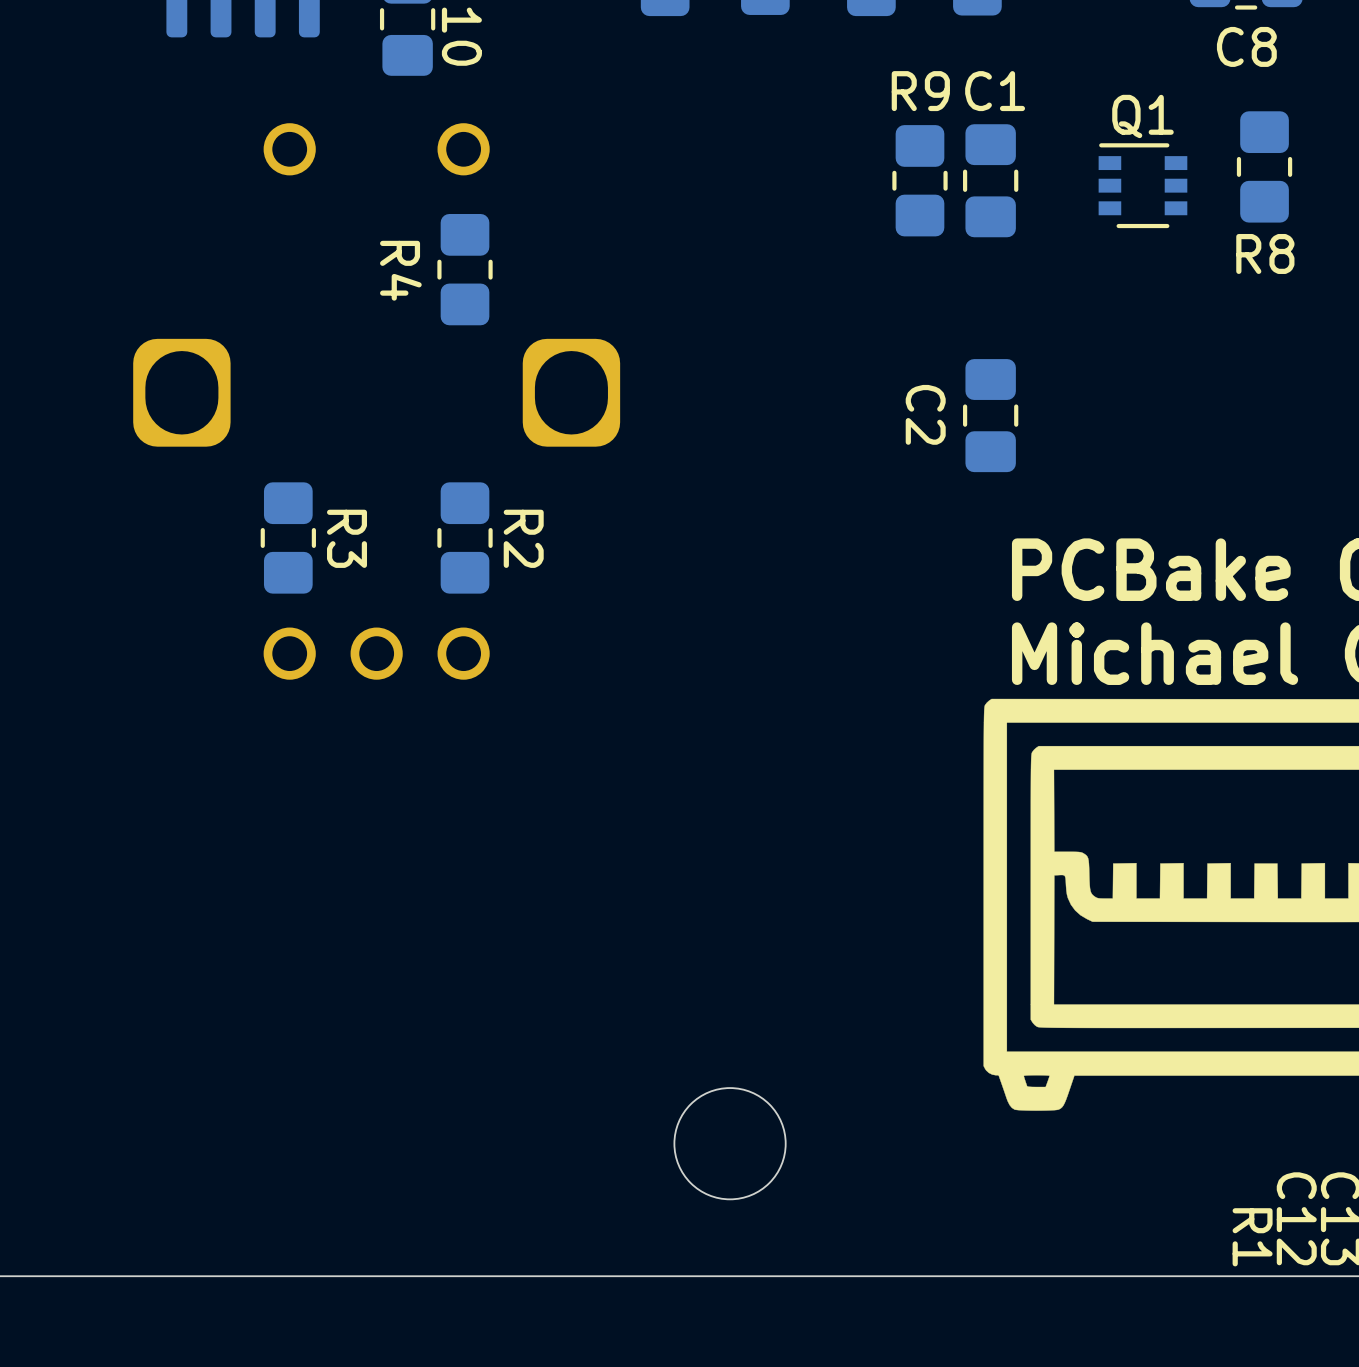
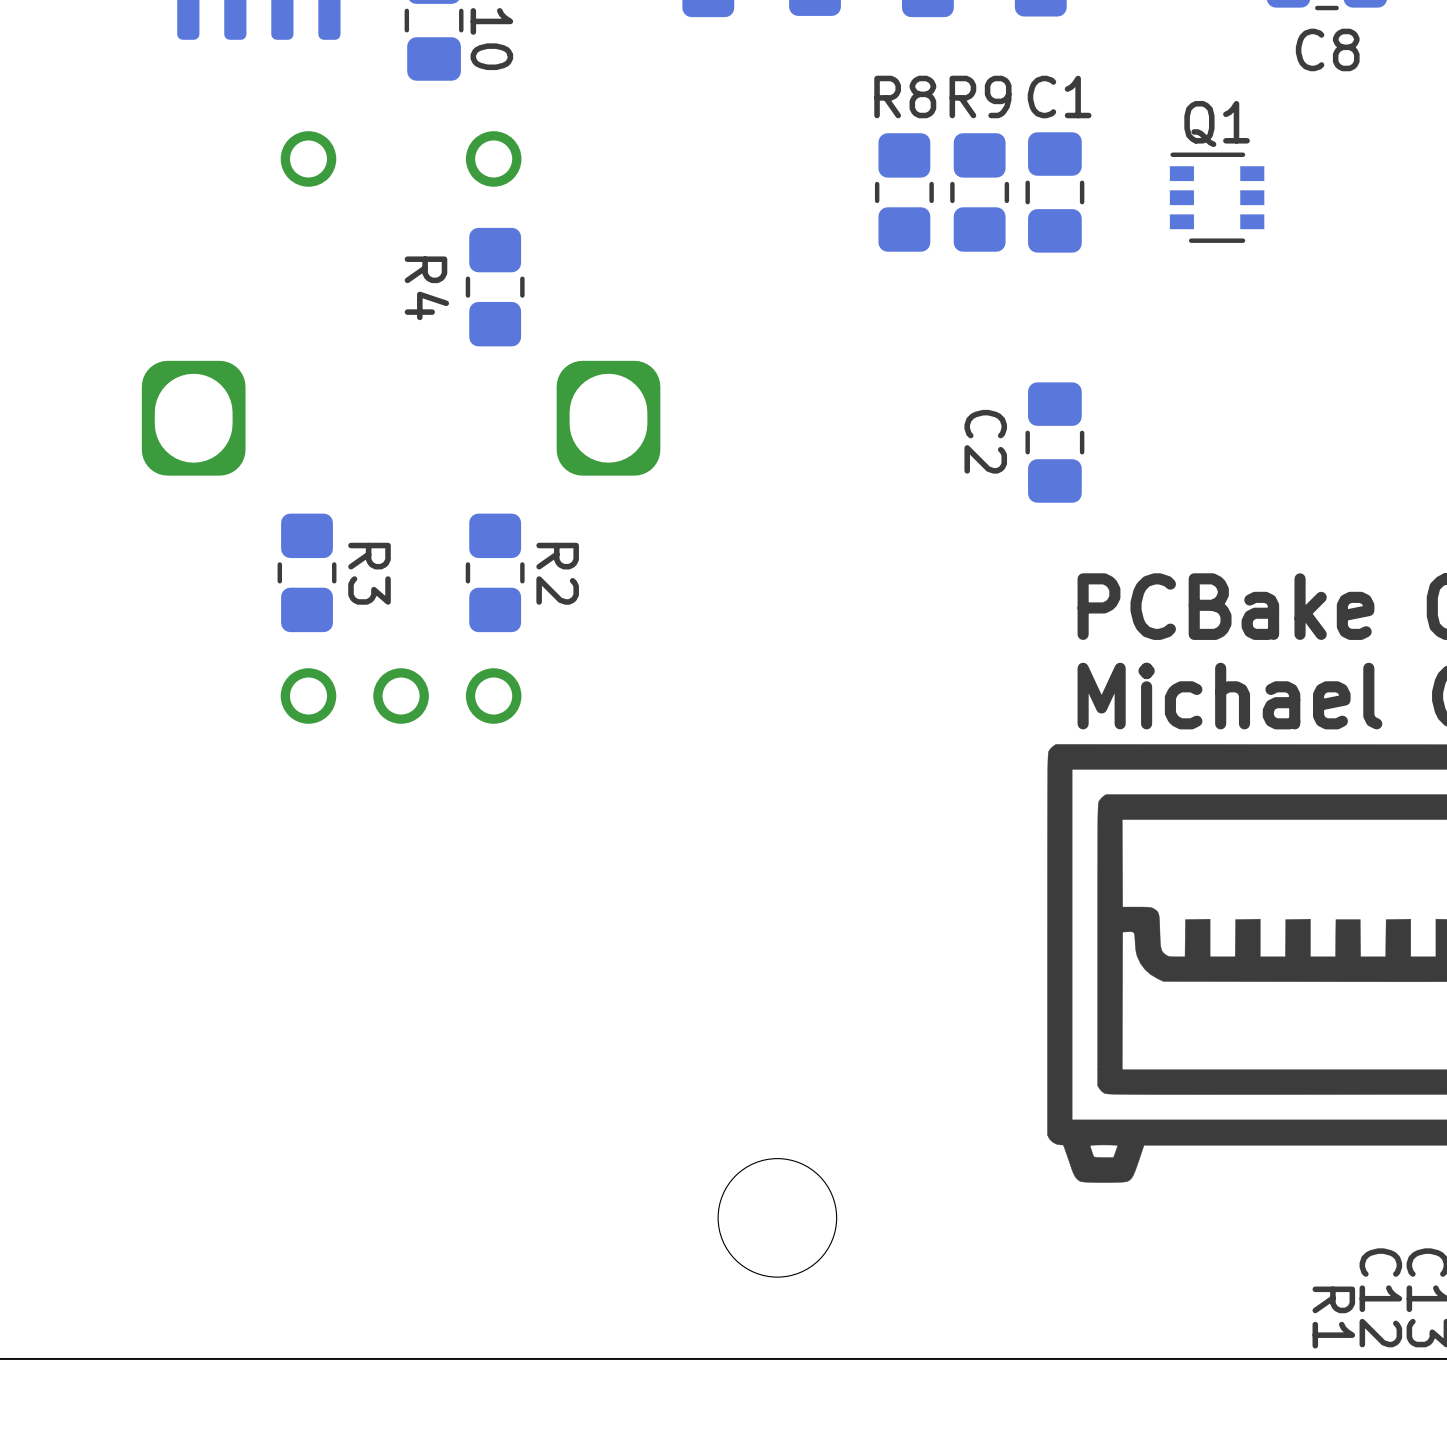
R8 position: (1264, 166) -> (904, 192)
R8 name position: R8 (1265, 253) -> R8 (905, 97)

